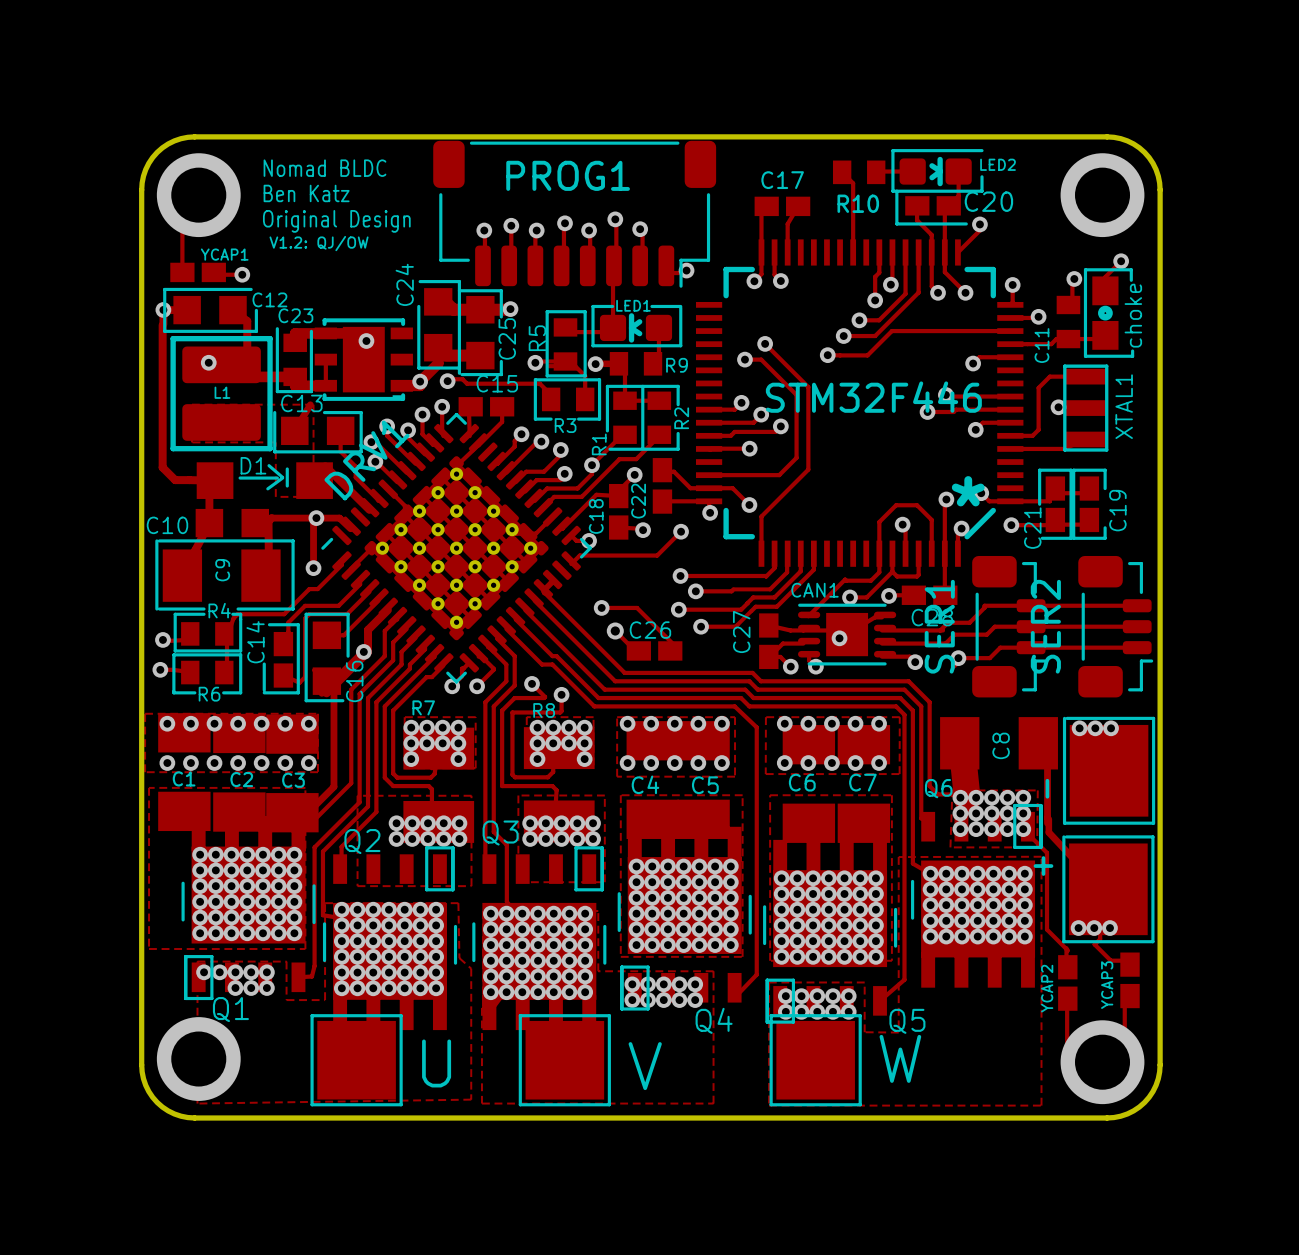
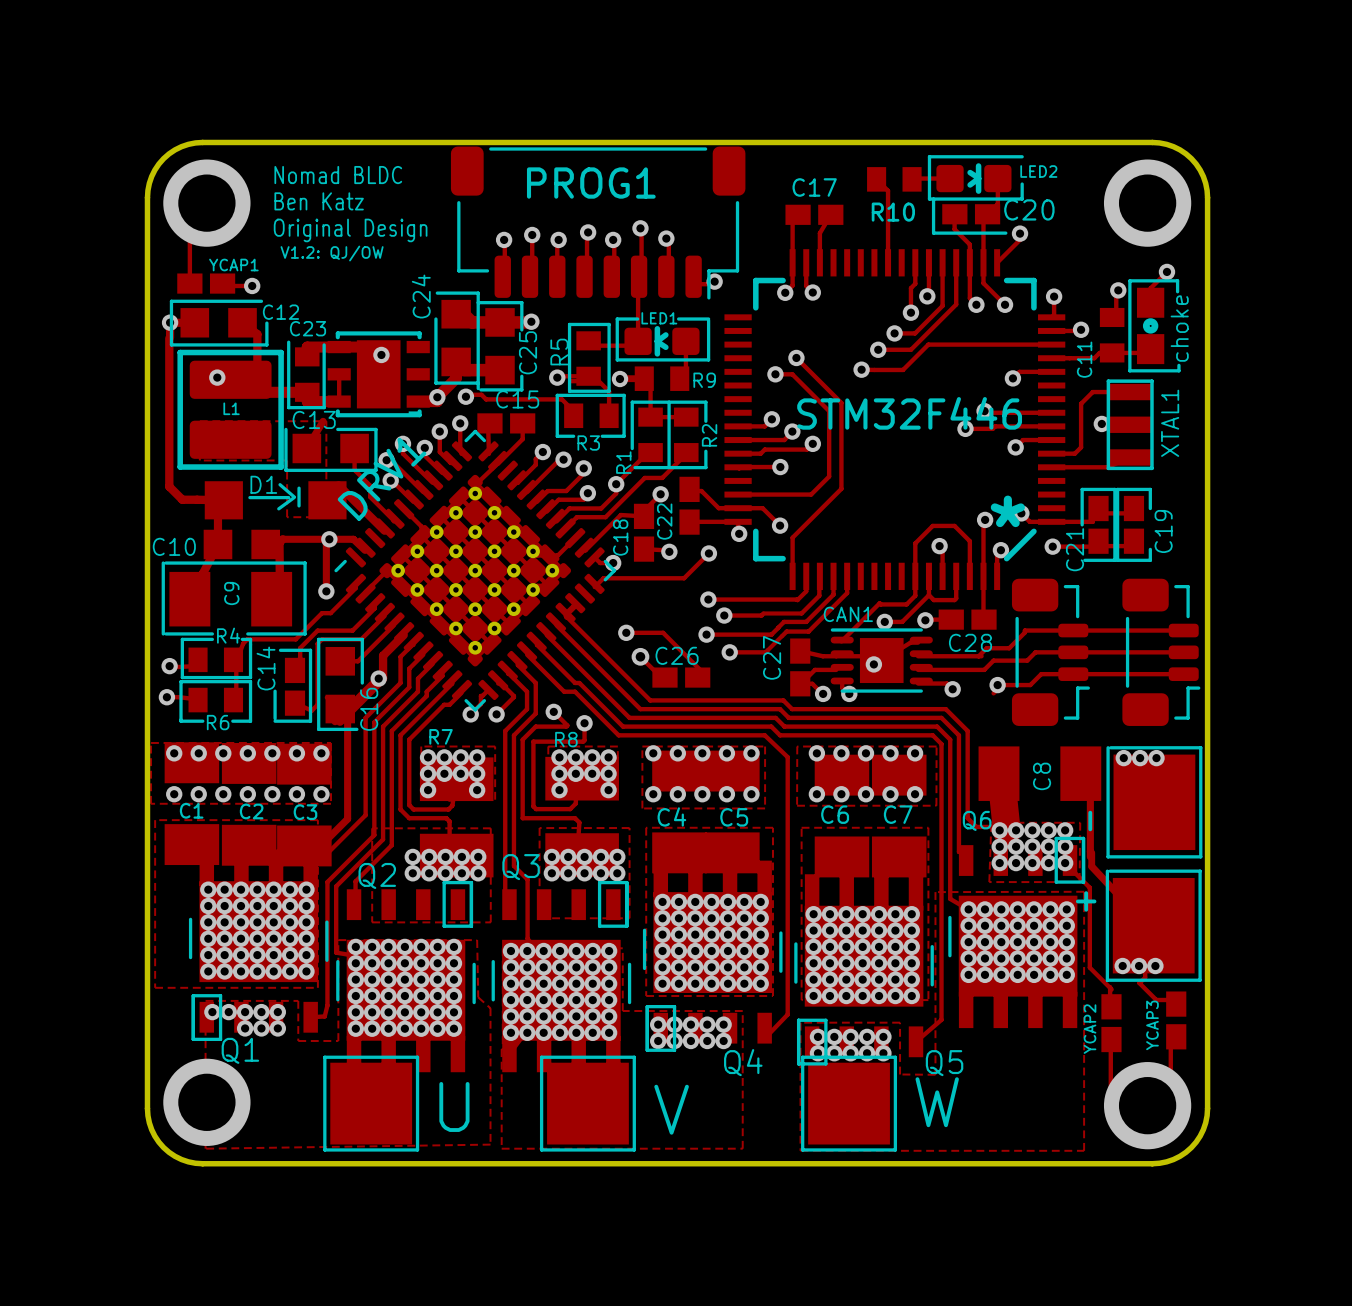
SER1 name: SER1 (939, 626) -> none
SER2 name: SER2 (1045, 626) -> none

